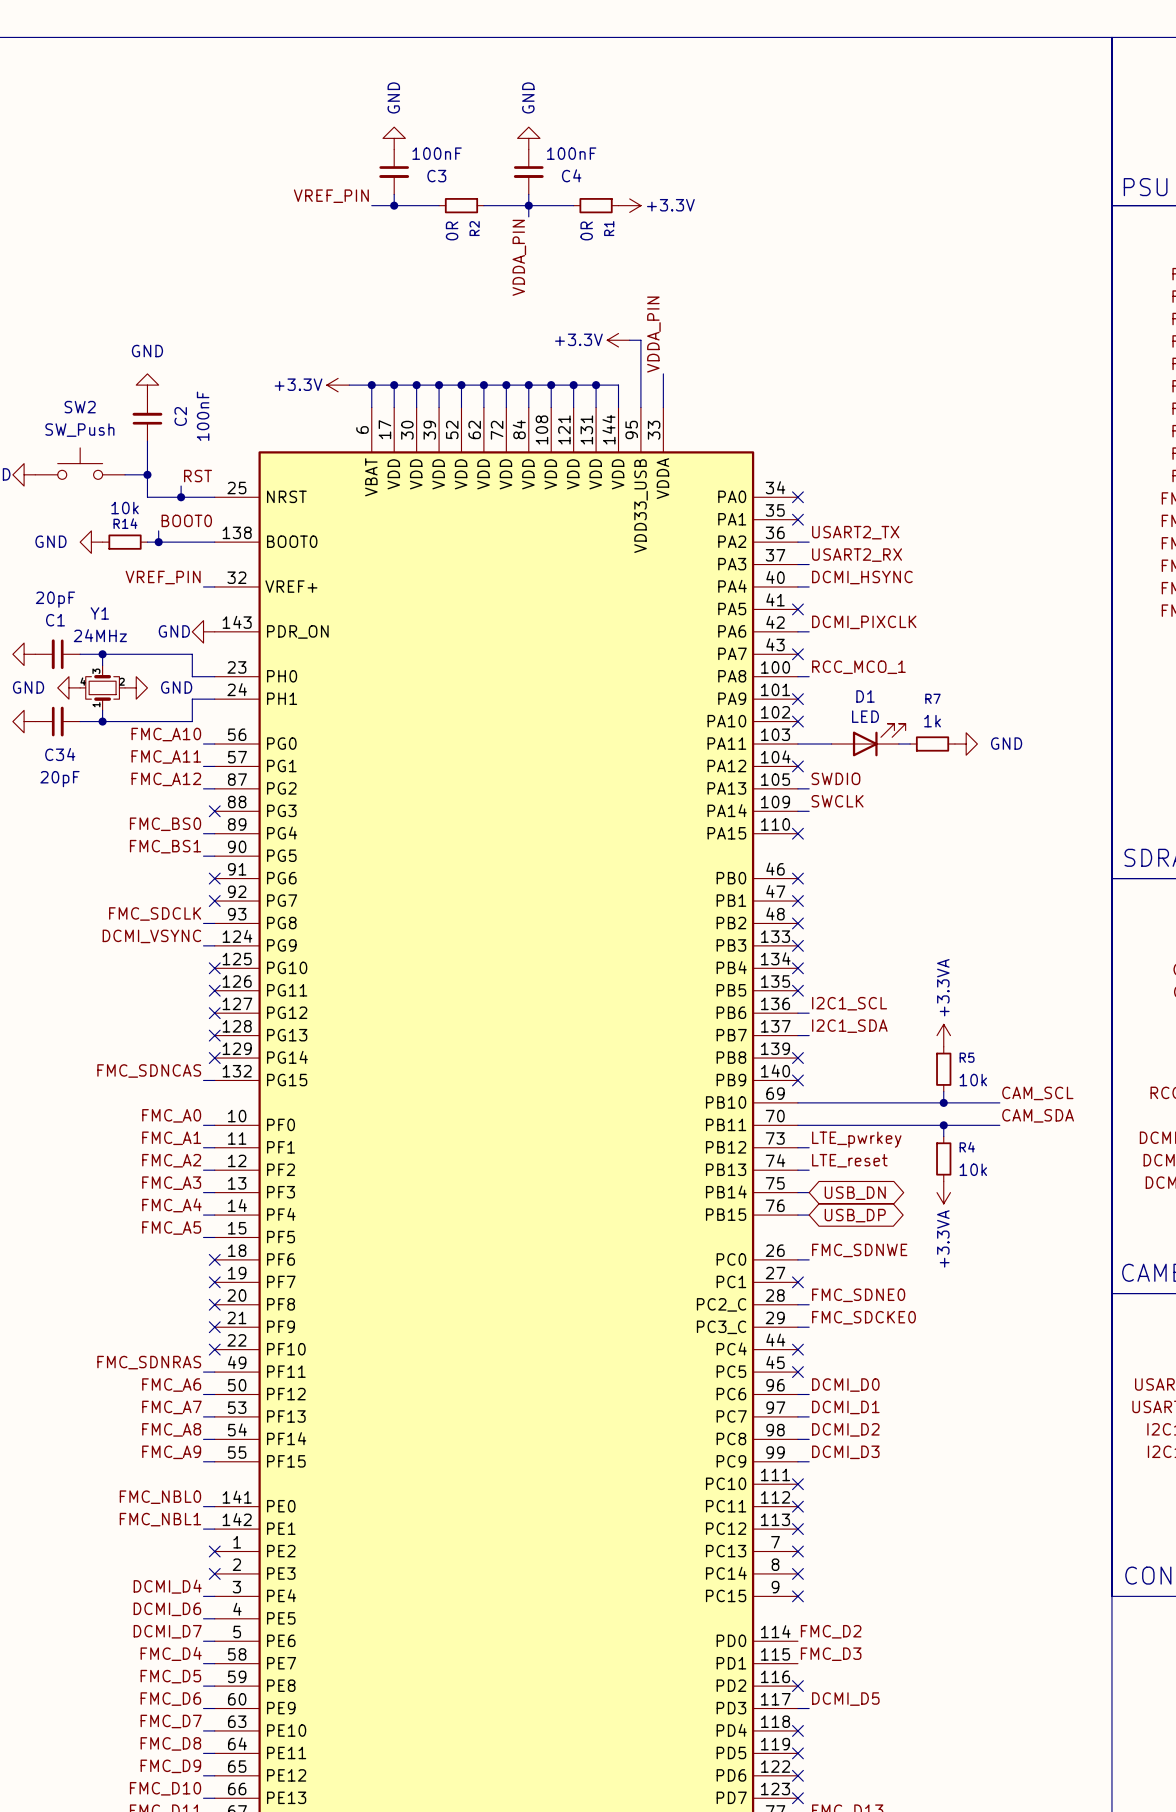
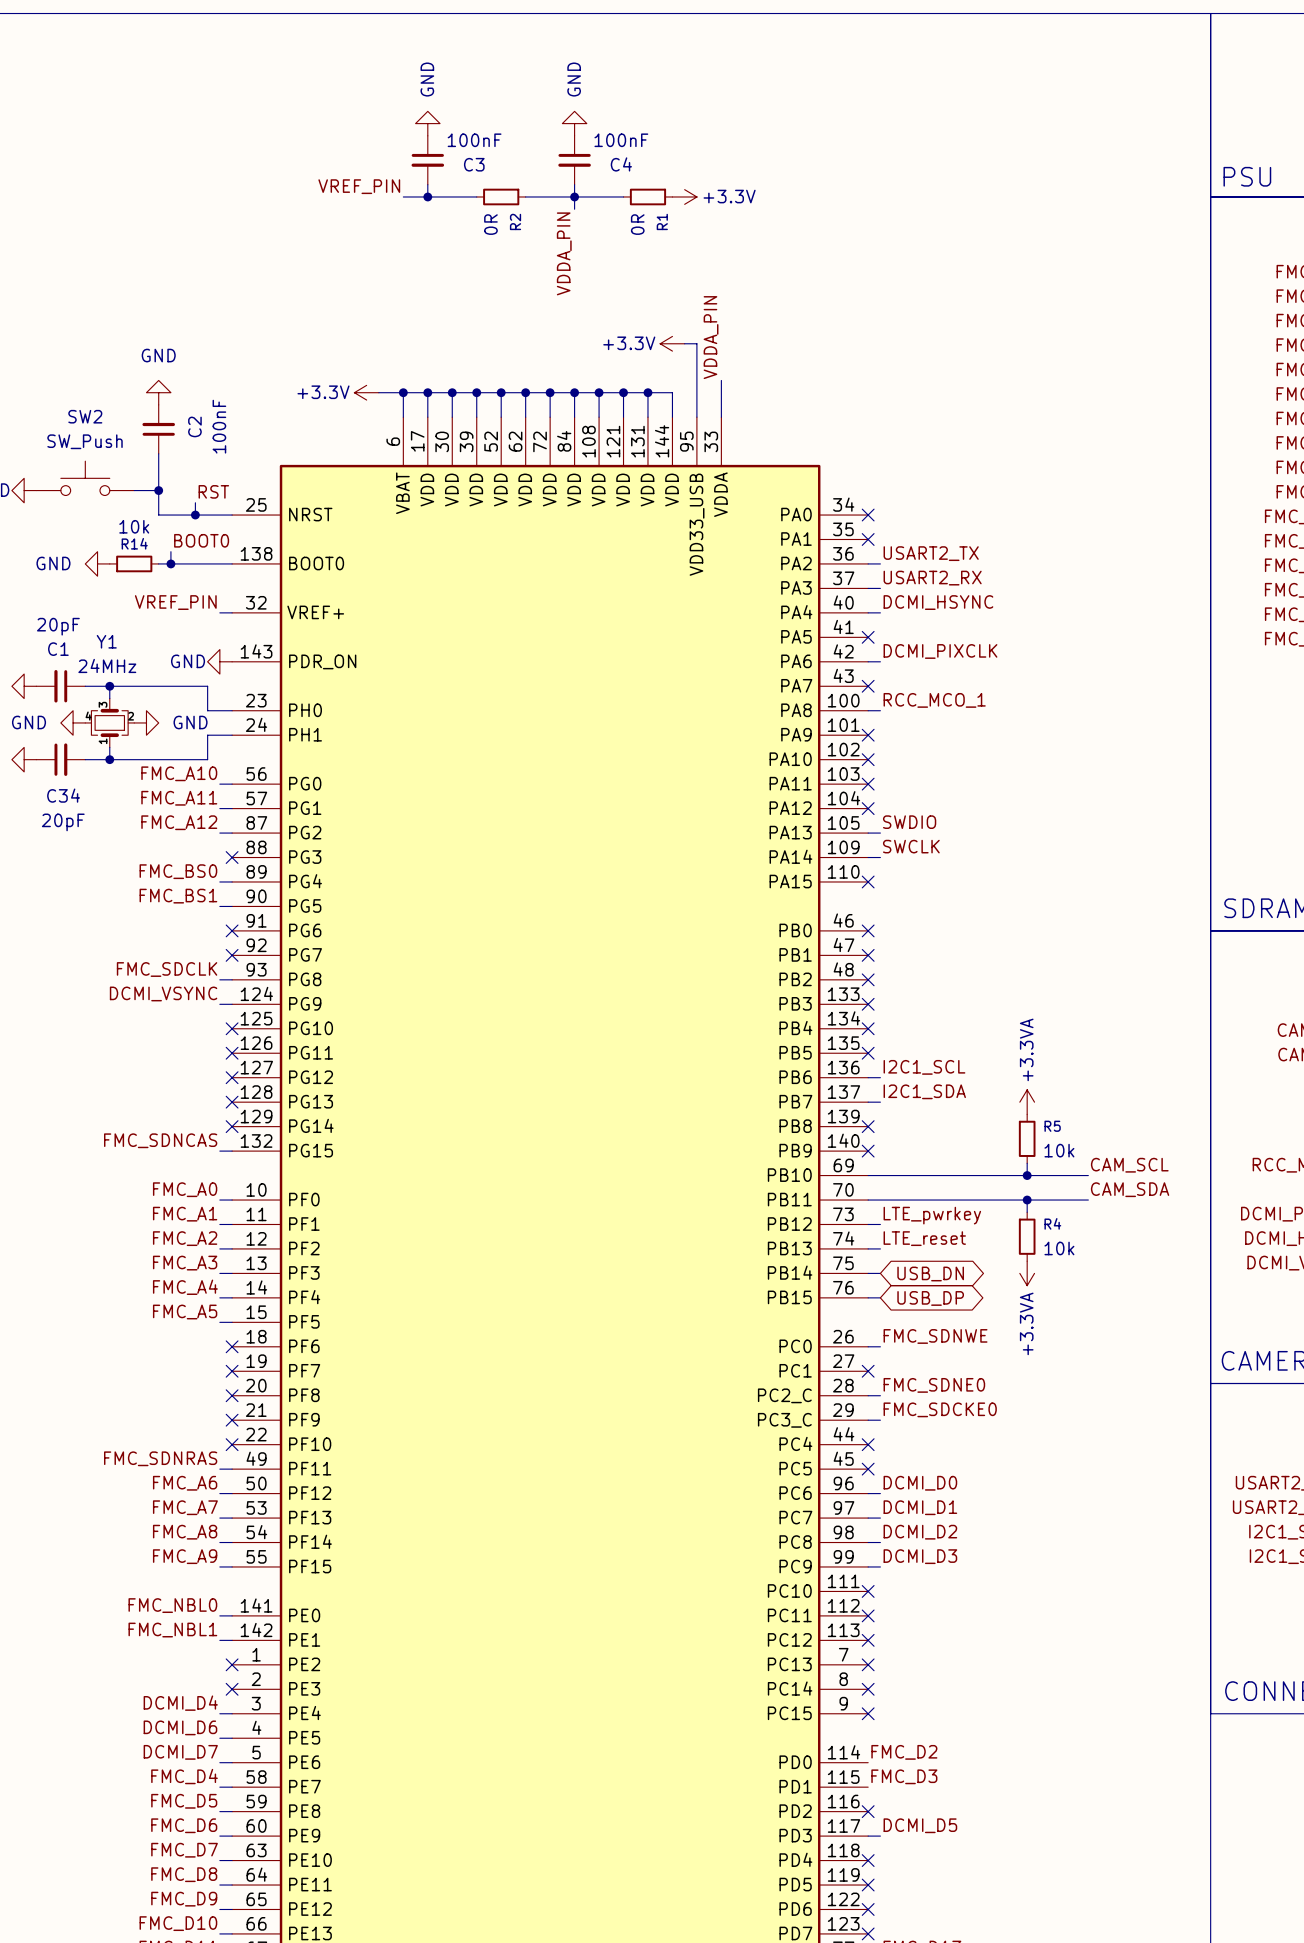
D1: LED (868, 740) -> none
wire: (797, 744) (831, 744) -> none
no-connect mark: none -> (868, 784)
wire: (898, 744) (910, 744) -> none
R7: 1k (932, 744) -> none
power symbol: GND (966, 744) -> none

